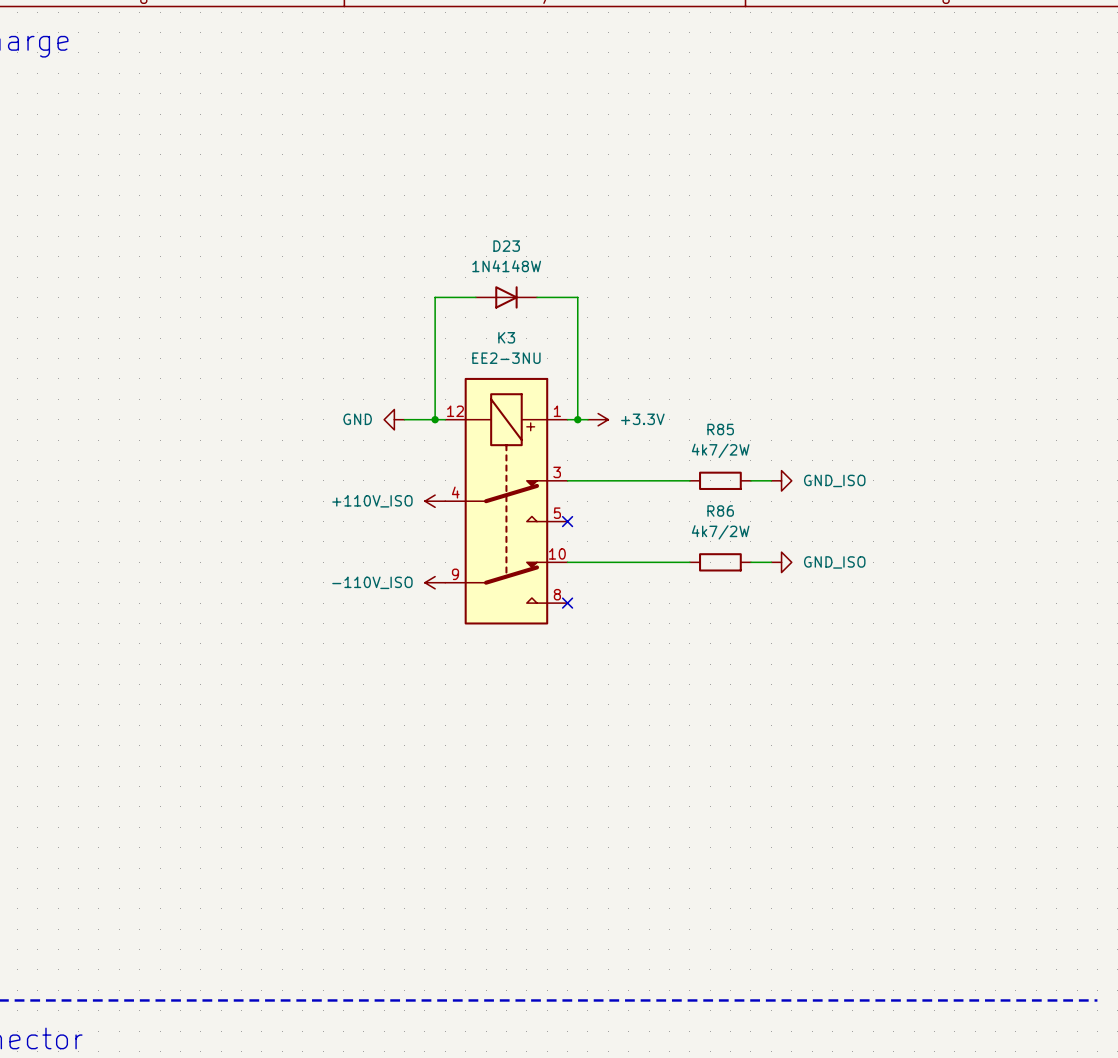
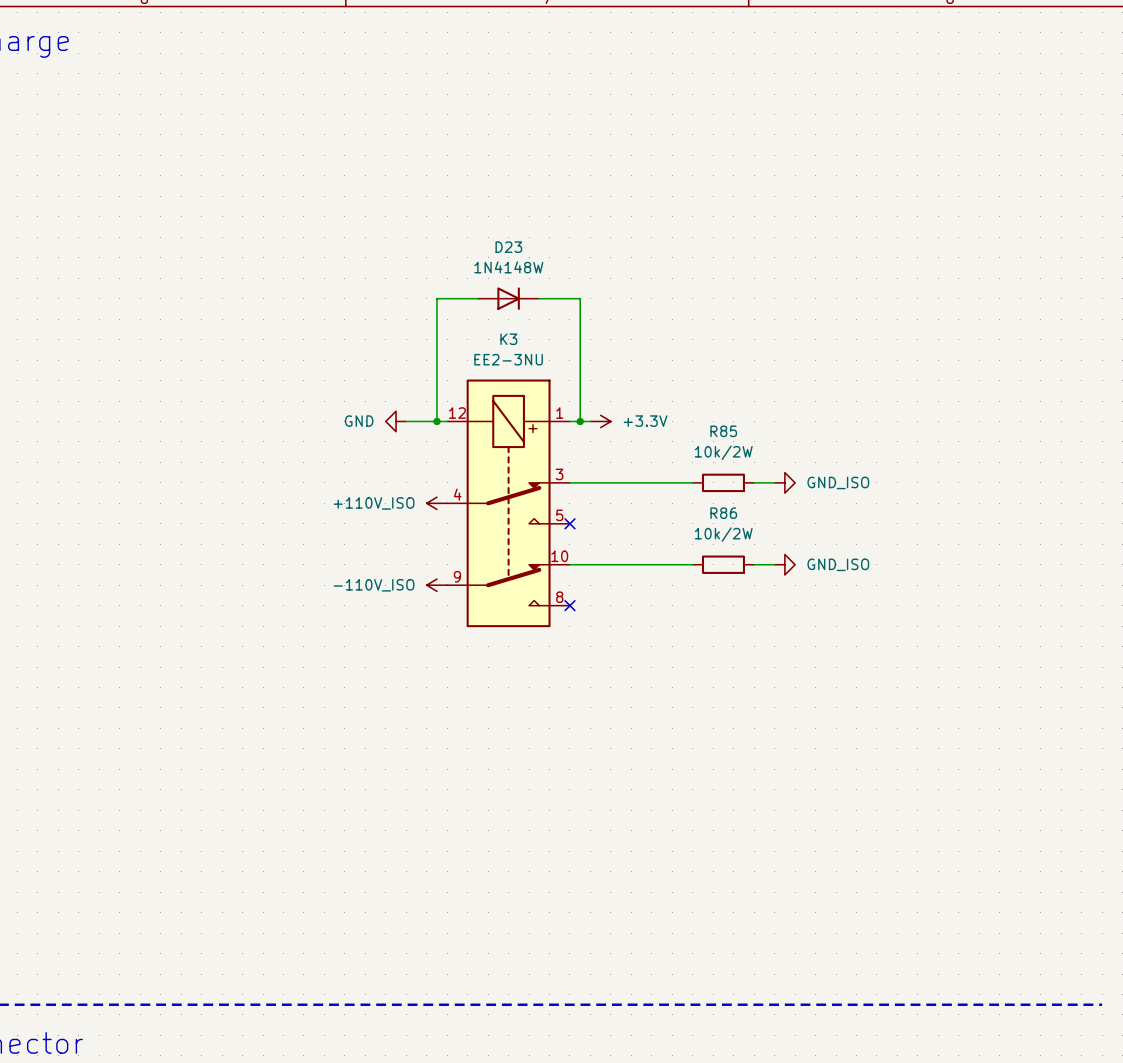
R85 value: 4k7/2W (720, 450) -> 10k/2W (723, 452)
R86 value: 4k7/2W (720, 532) -> 10k/2W (723, 534)

